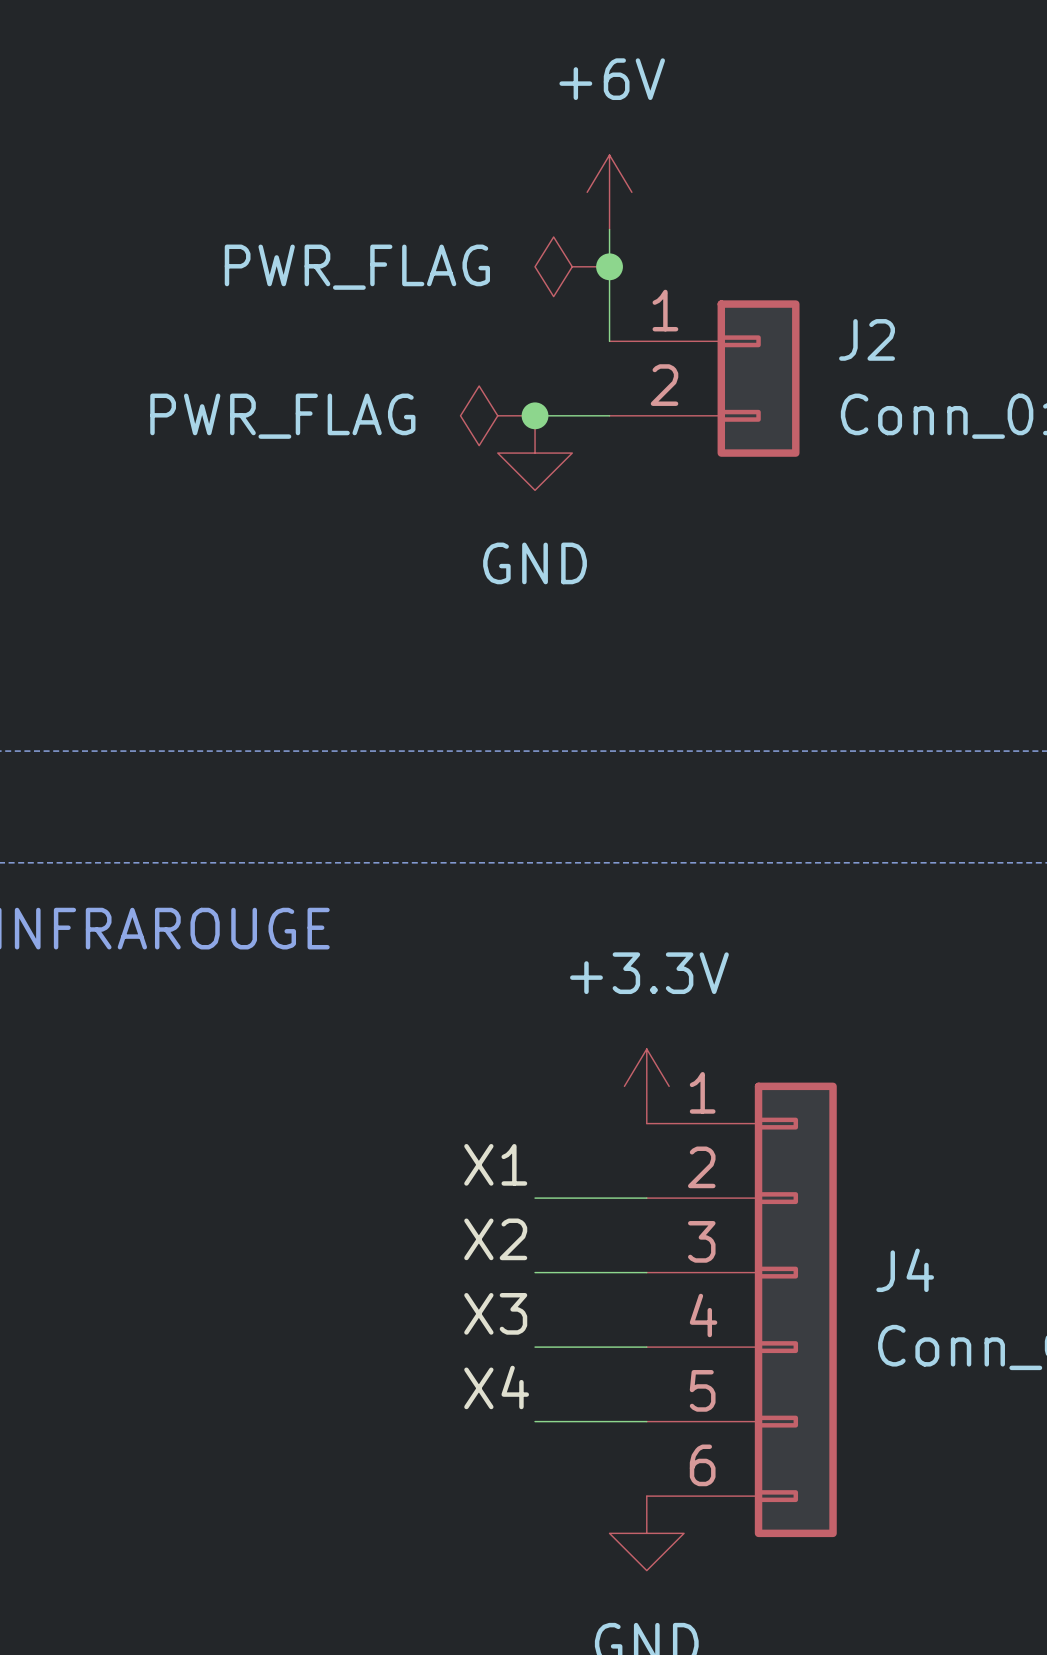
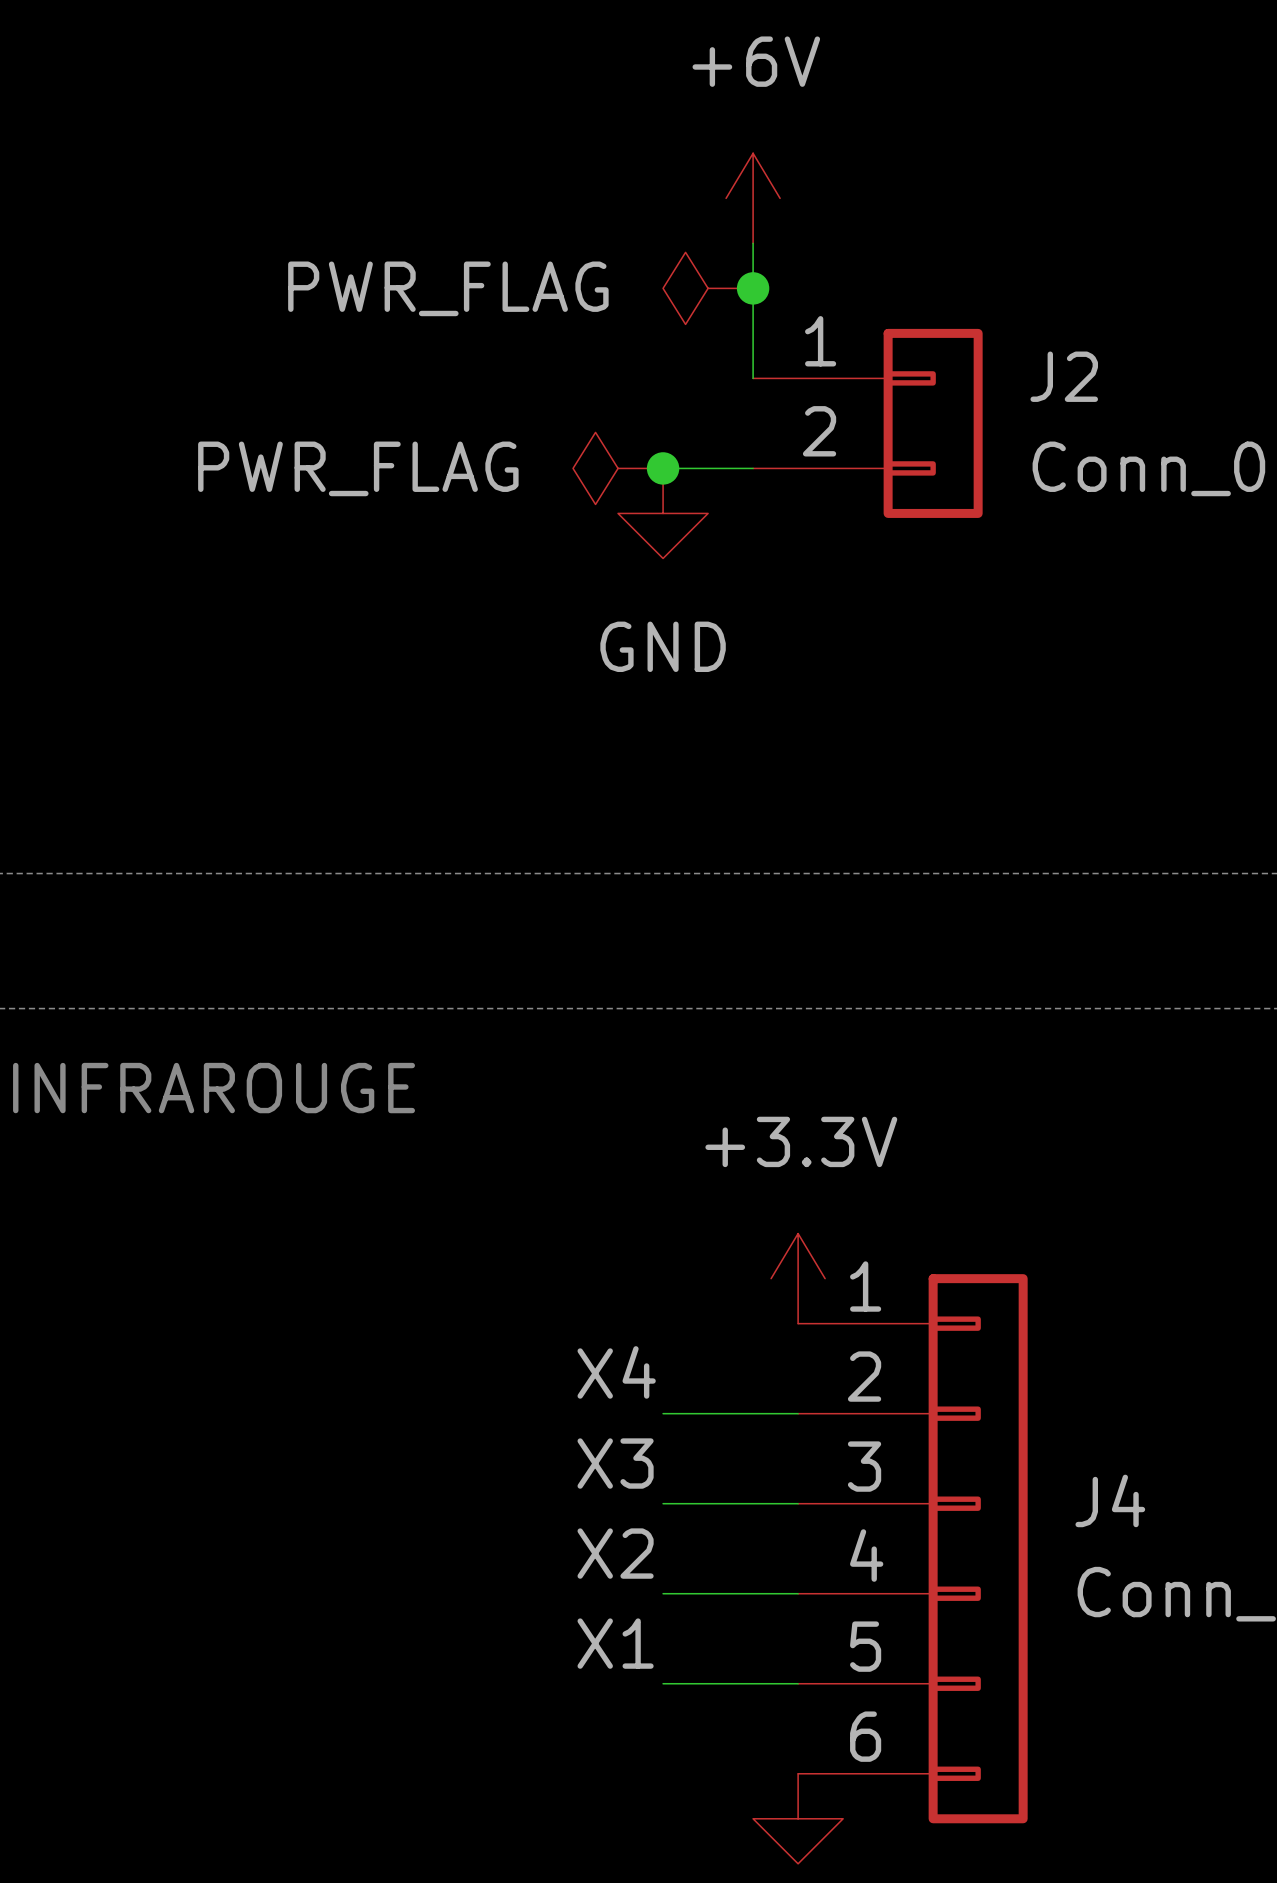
label: X1 (495, 1164) -> X4 (616, 1372)
label: X2 (495, 1239) -> X3 (615, 1463)
label: X3 (495, 1313) -> X2 (615, 1553)
label: X4 (496, 1387) -> X1 (615, 1643)

